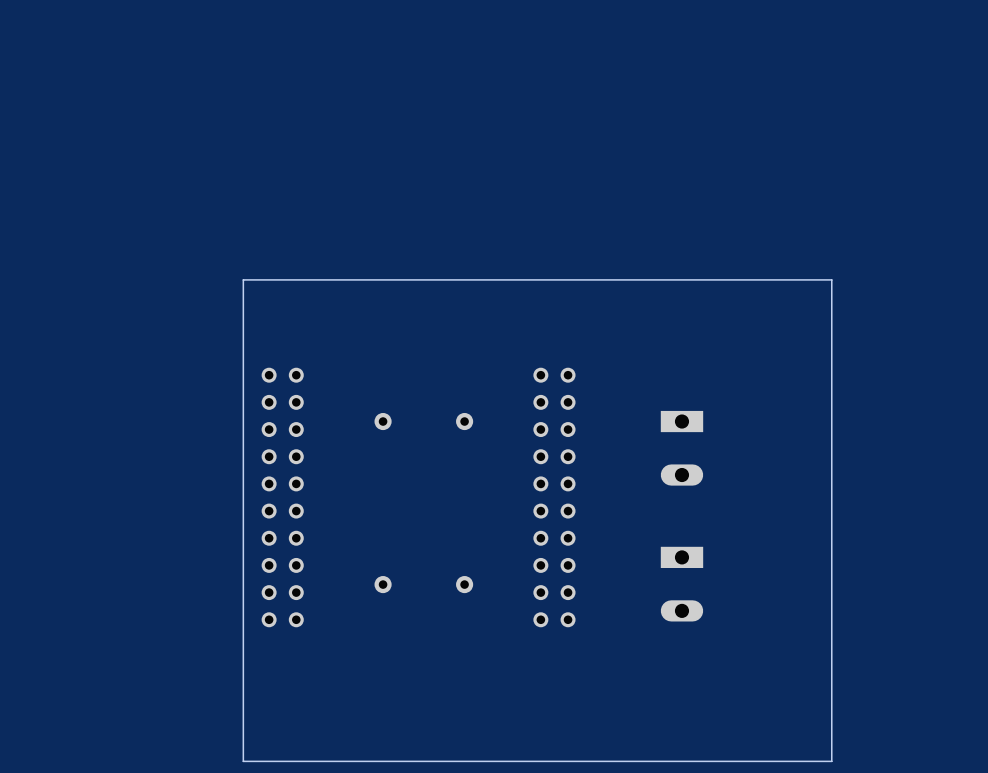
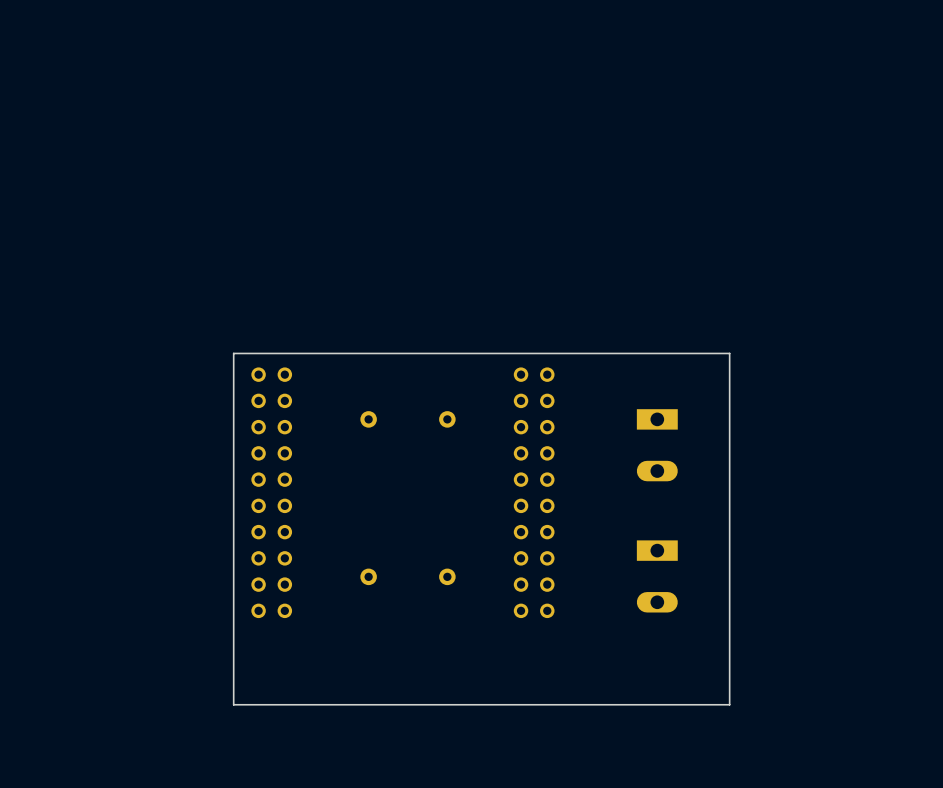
board edge: (243, 353) (243, 279) (831, 279) (831, 761) (243, 761) (243, 717) -> (233, 353) (729, 353) (729, 704) (233, 704)

